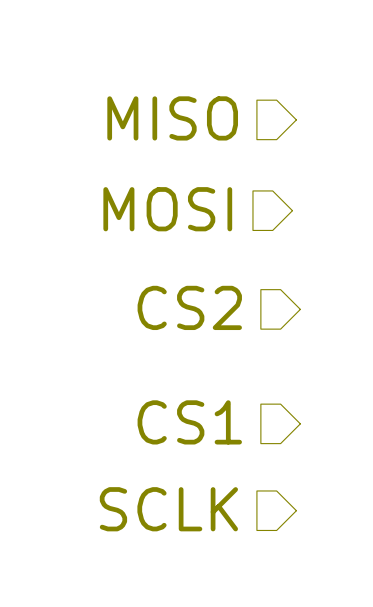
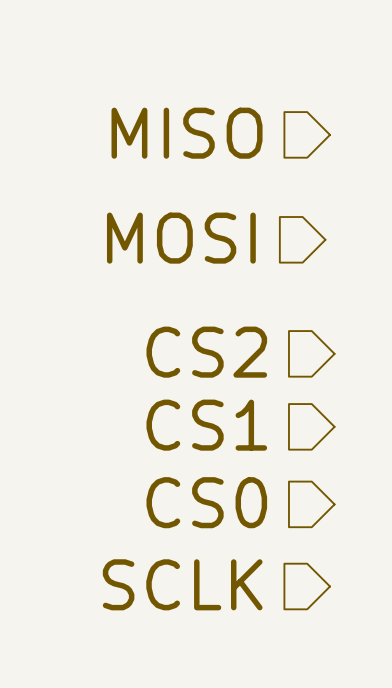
hierarchical label position: CS1 (189, 422) -> CS1 (206, 425)
hierarchical label: none -> CS0 (206, 502)

